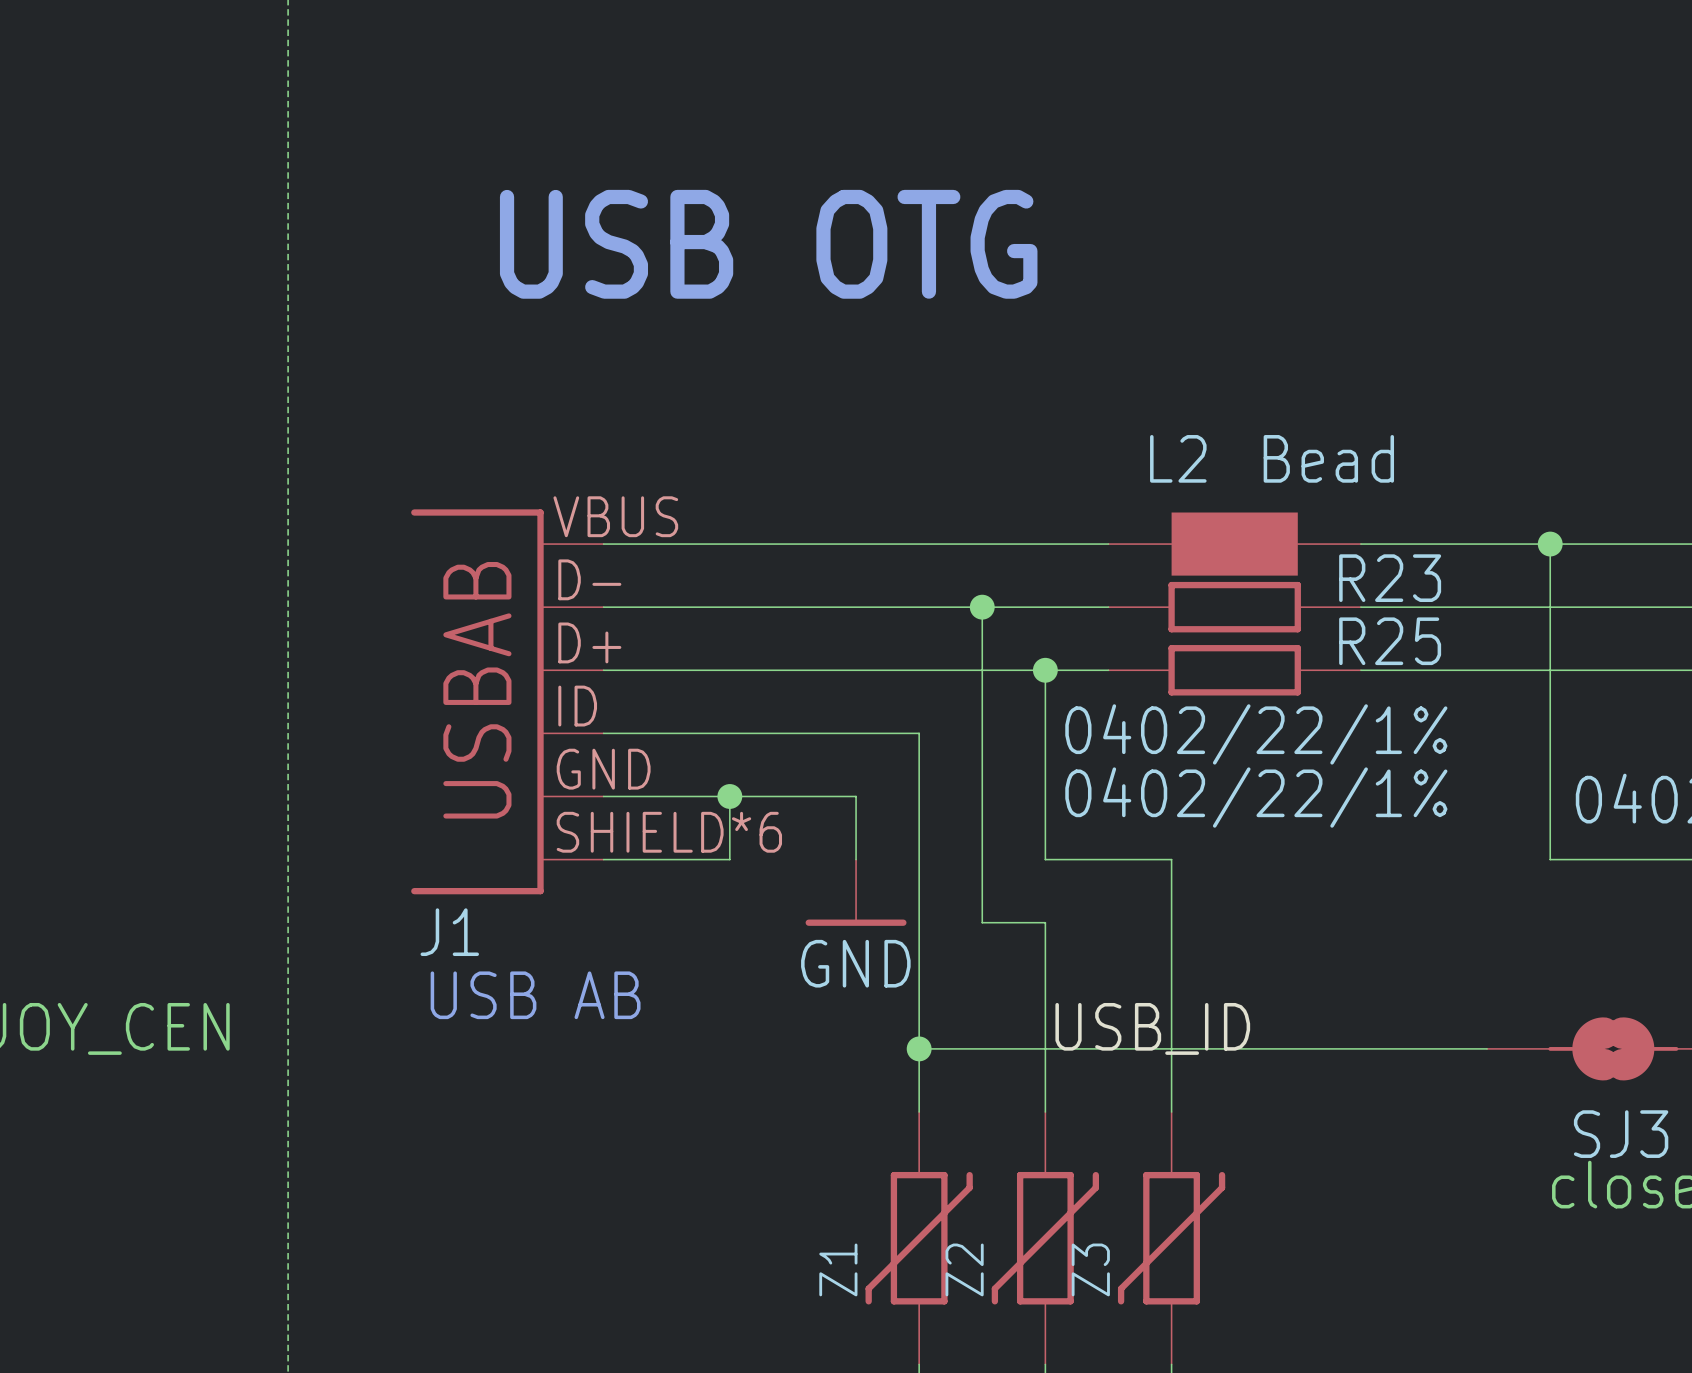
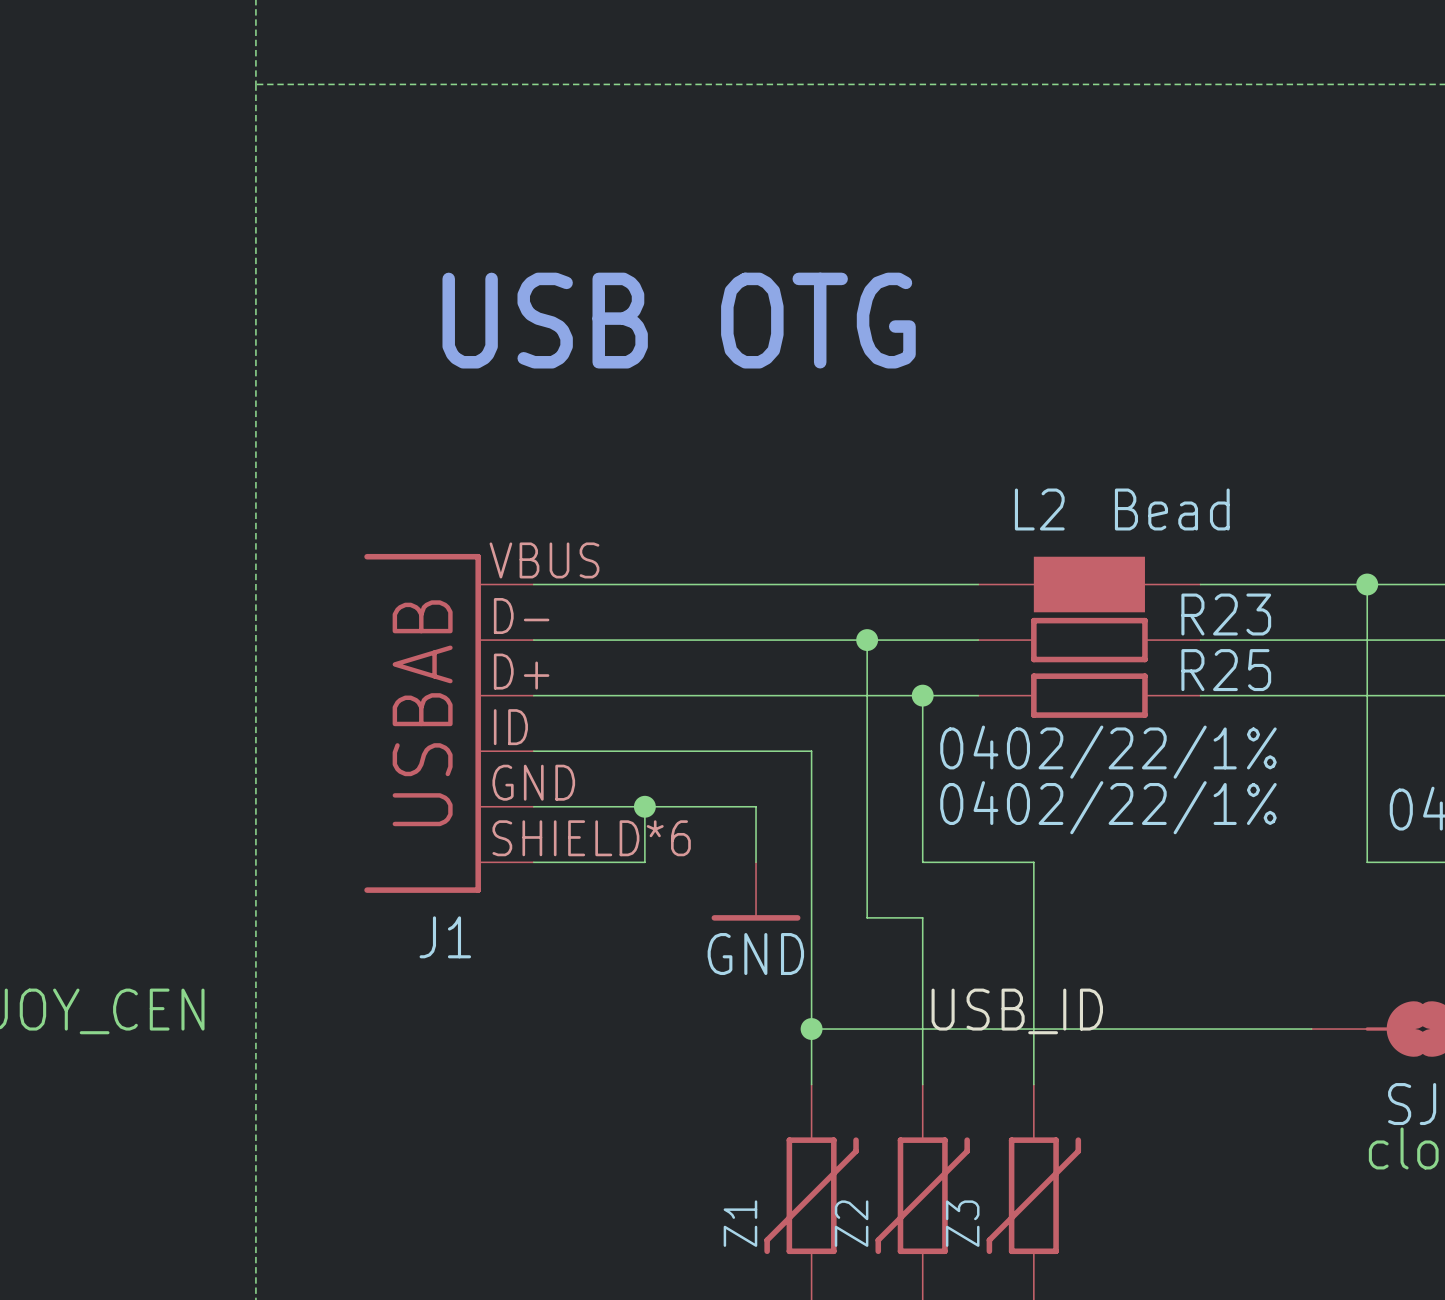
J1 name position: J1 (449, 932) -> J1 (445, 937)
text: USB AB (535, 995) -> none

